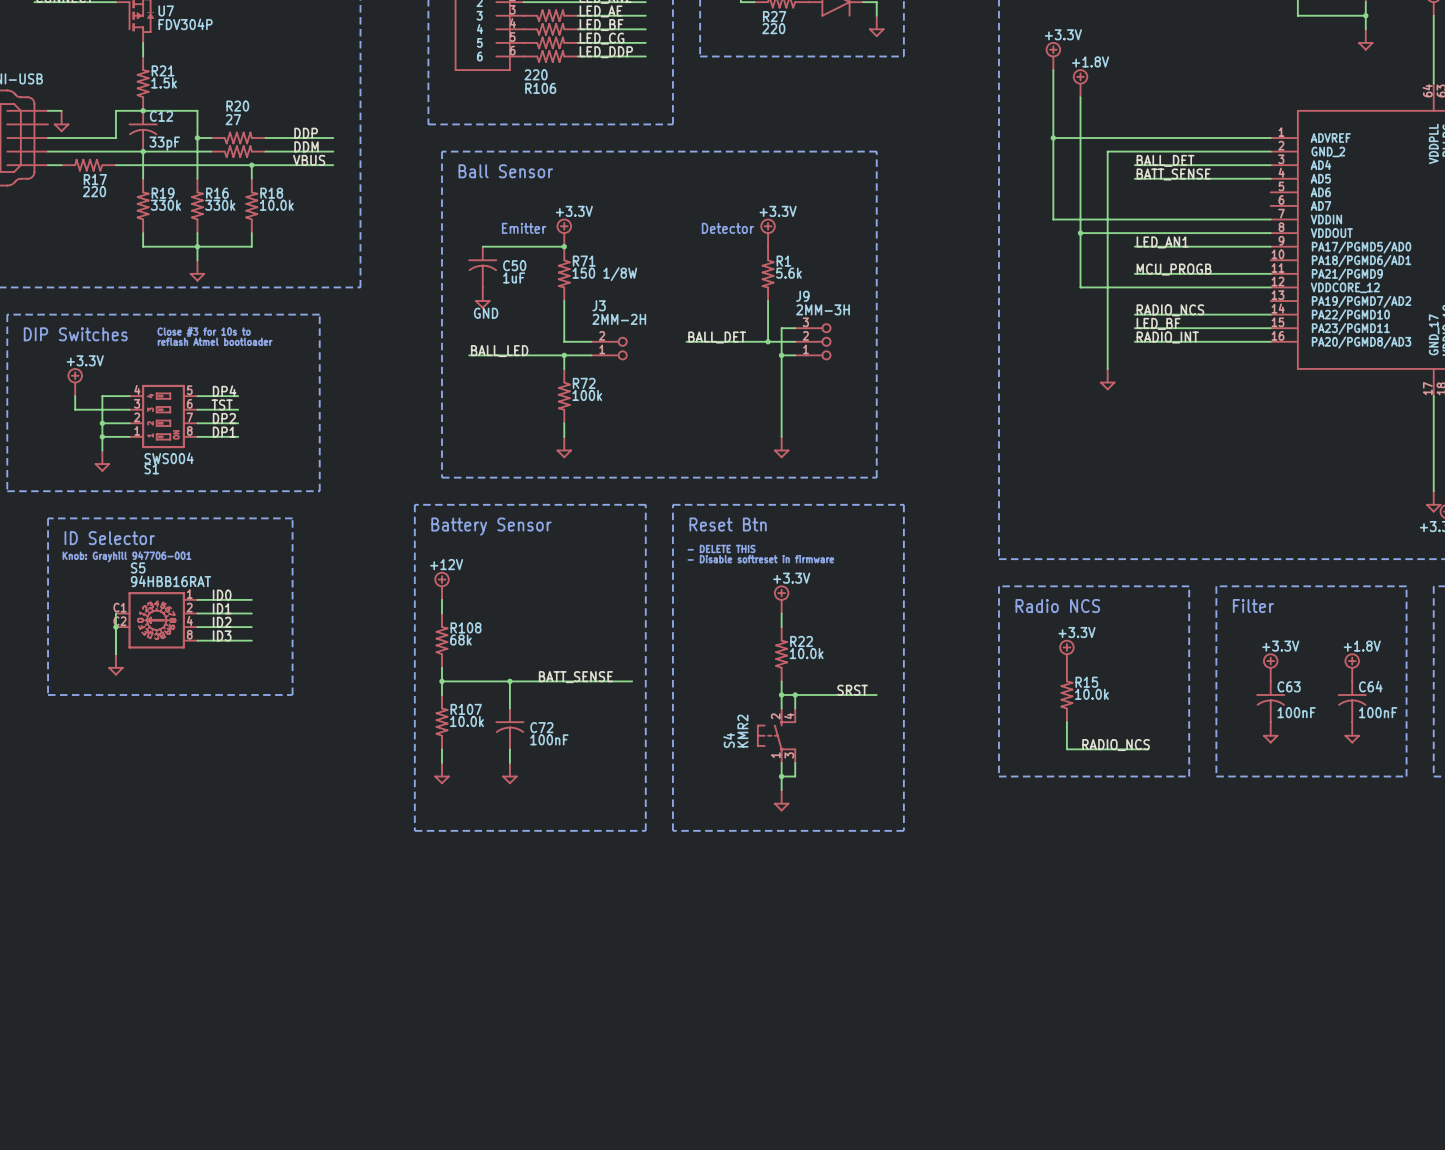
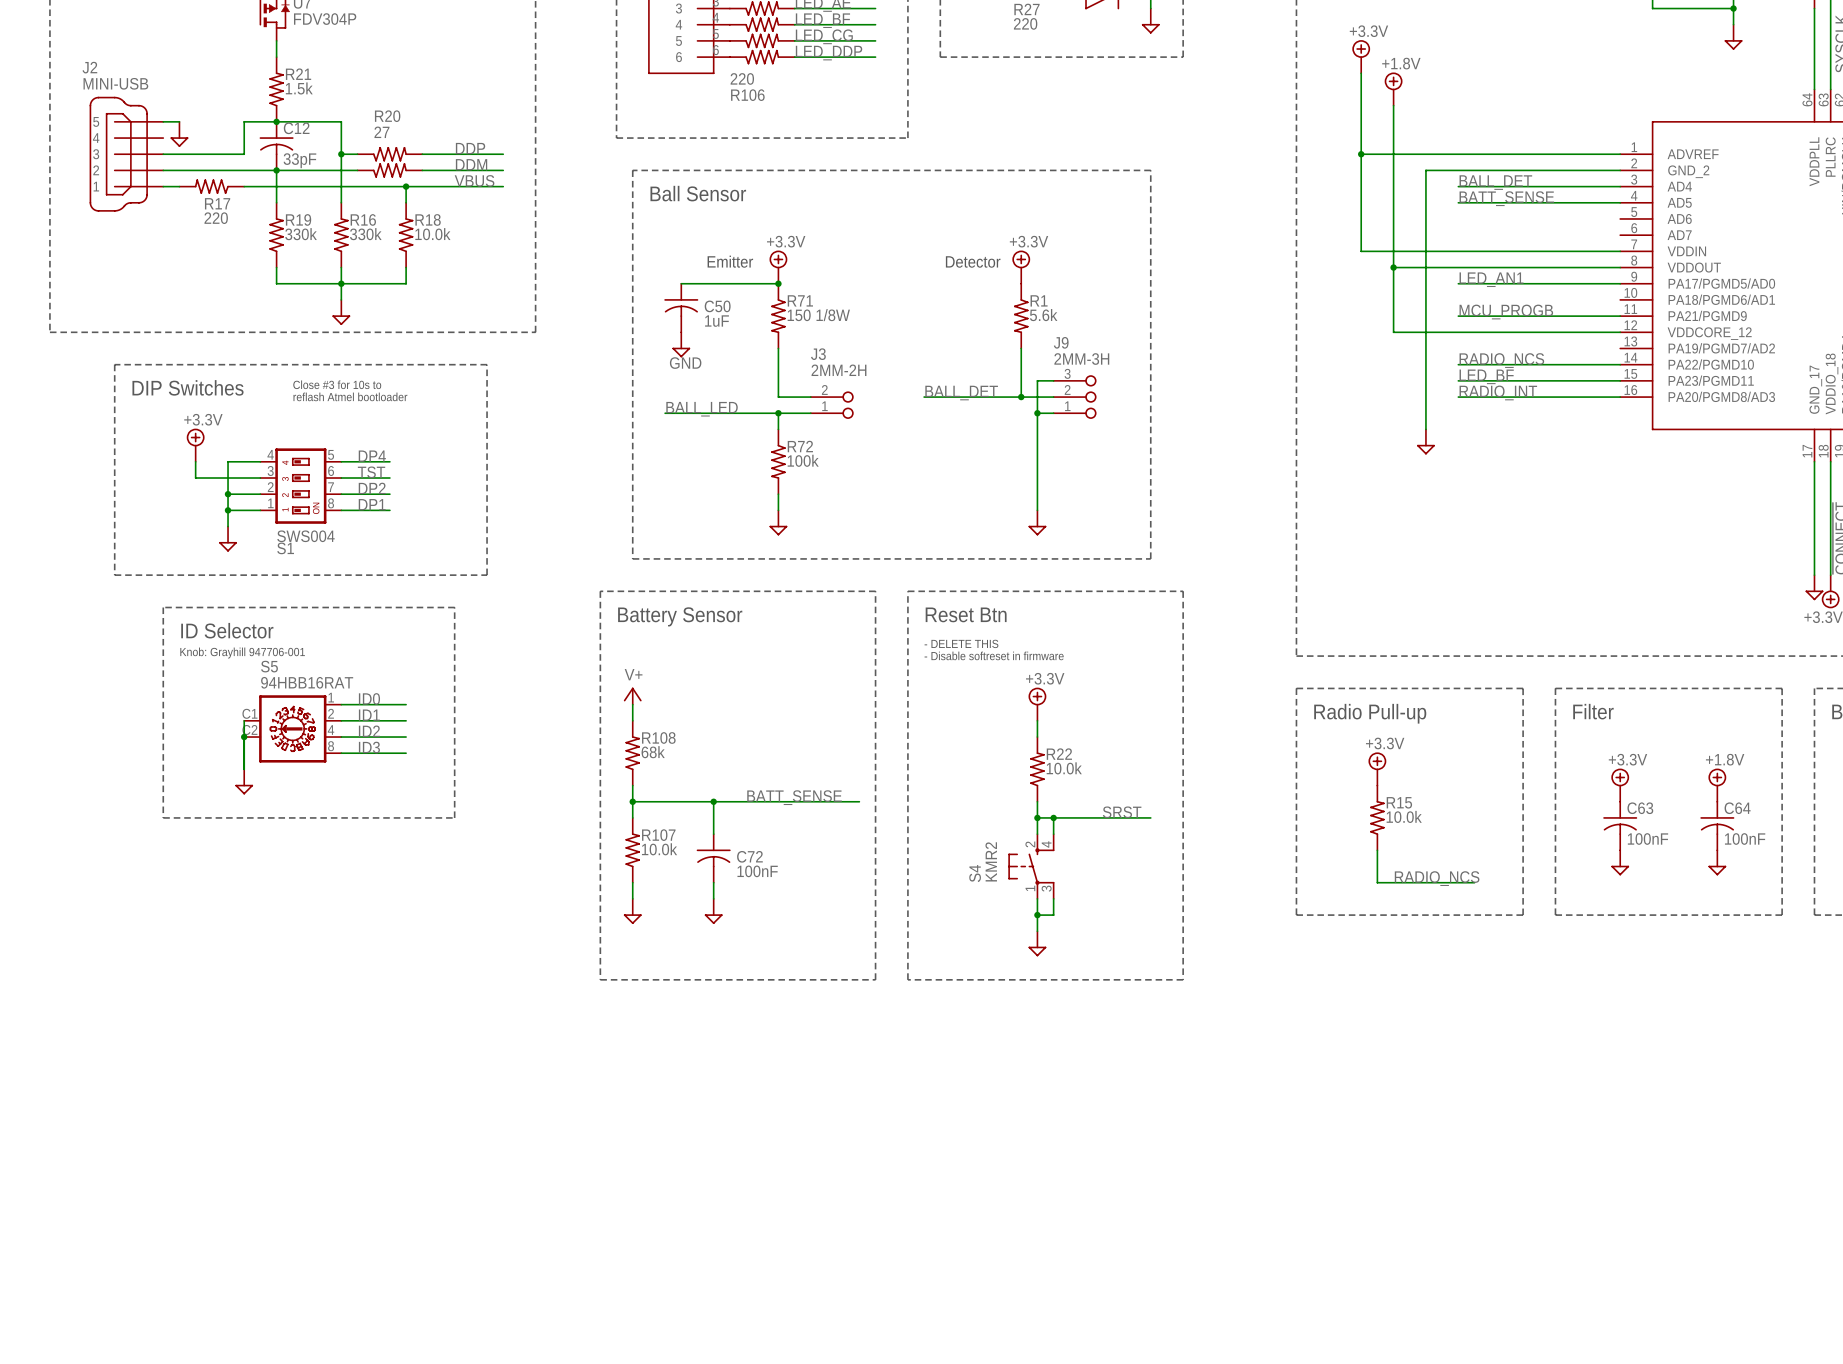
power symbol: +12V (442, 585) -> none
power symbol: none -> V+ (632, 696)
text: Radio NCS (1057, 606) -> Radio Pull-up (1370, 713)

